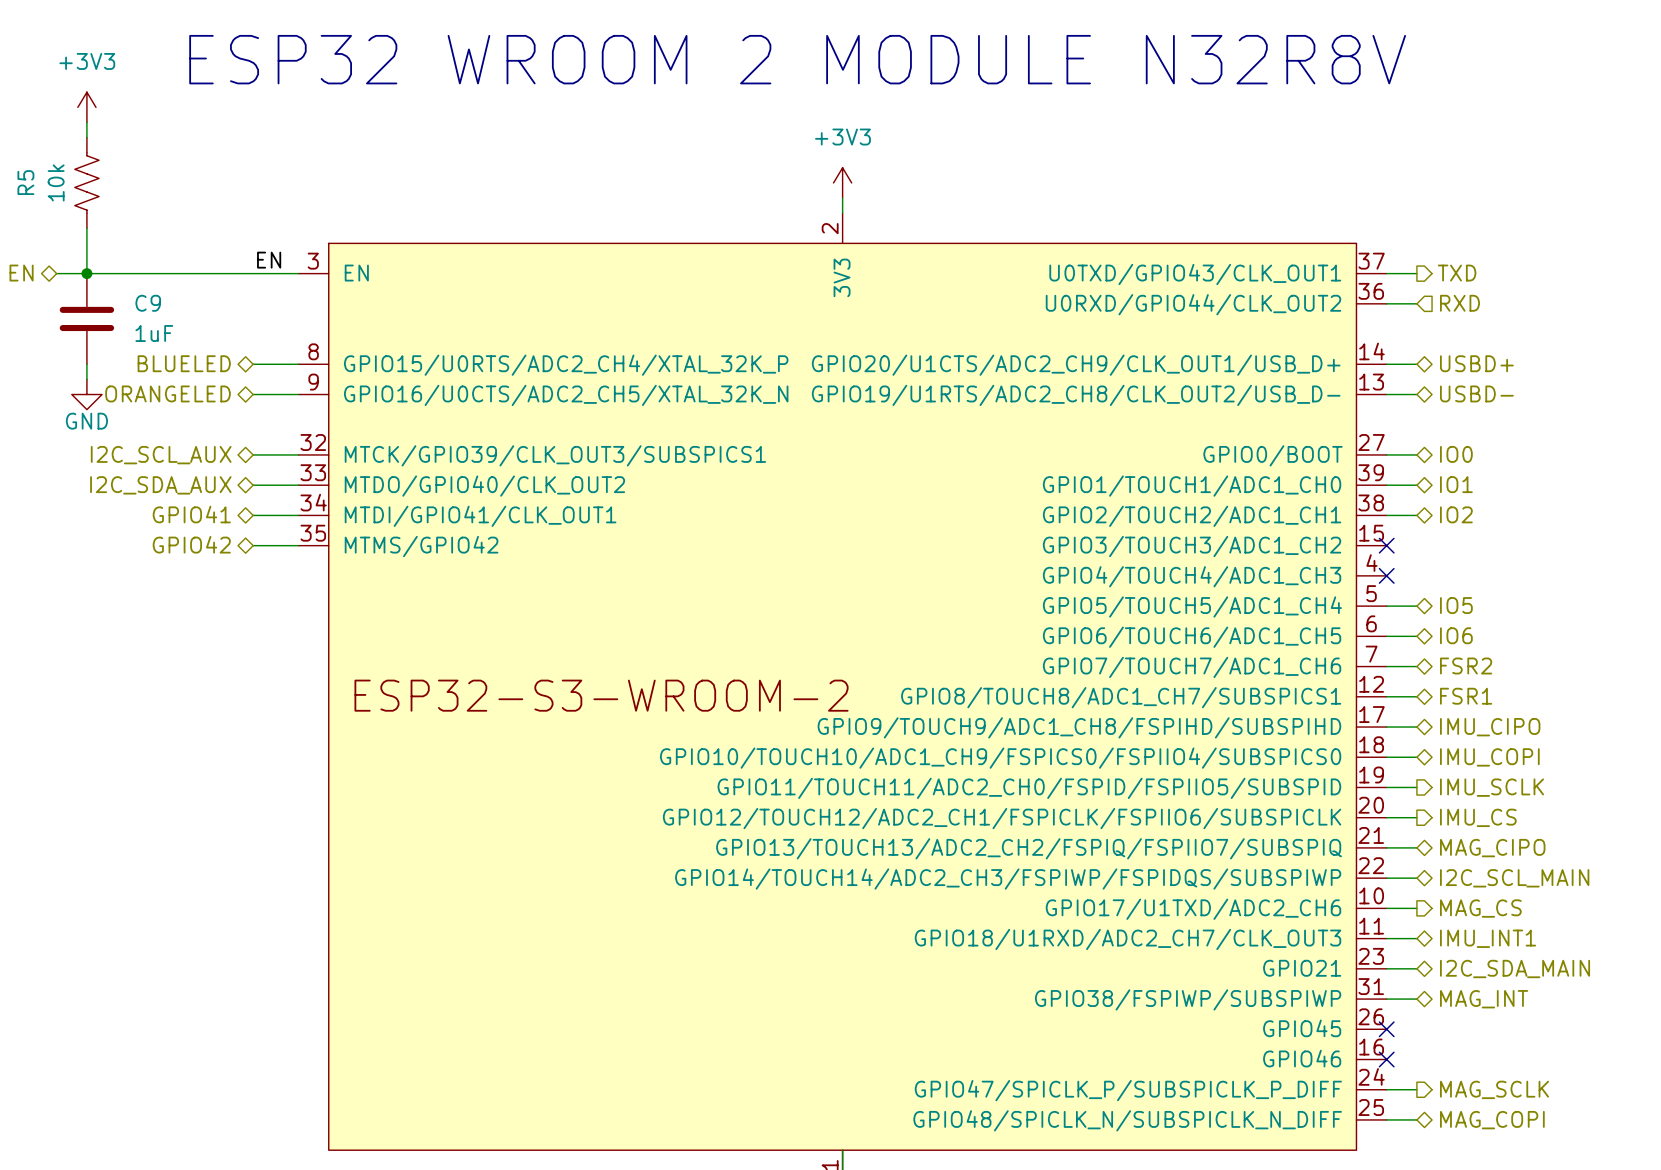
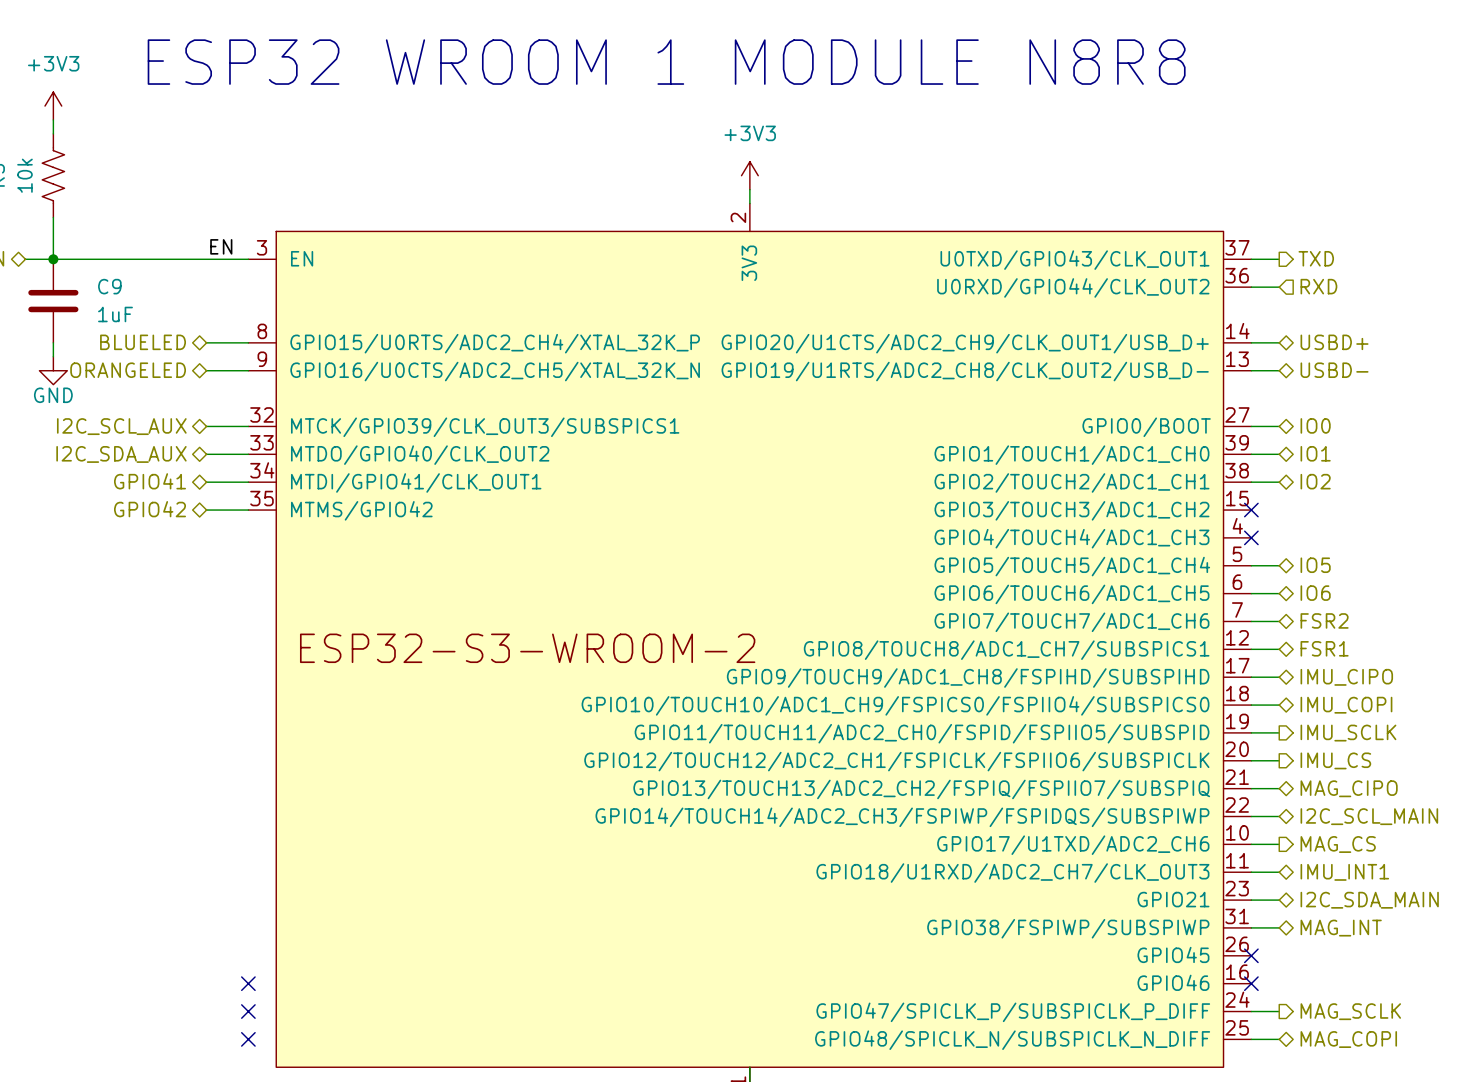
text: ESP32 WROOM 2 MODULE N32R8V (797, 59) -> ESP32 WROOM 1 MODULE N8R8 (666, 62)
no-connect mark: none -> (248, 983)
no-connect mark: none -> (248, 1011)
no-connect mark: none -> (248, 1039)

